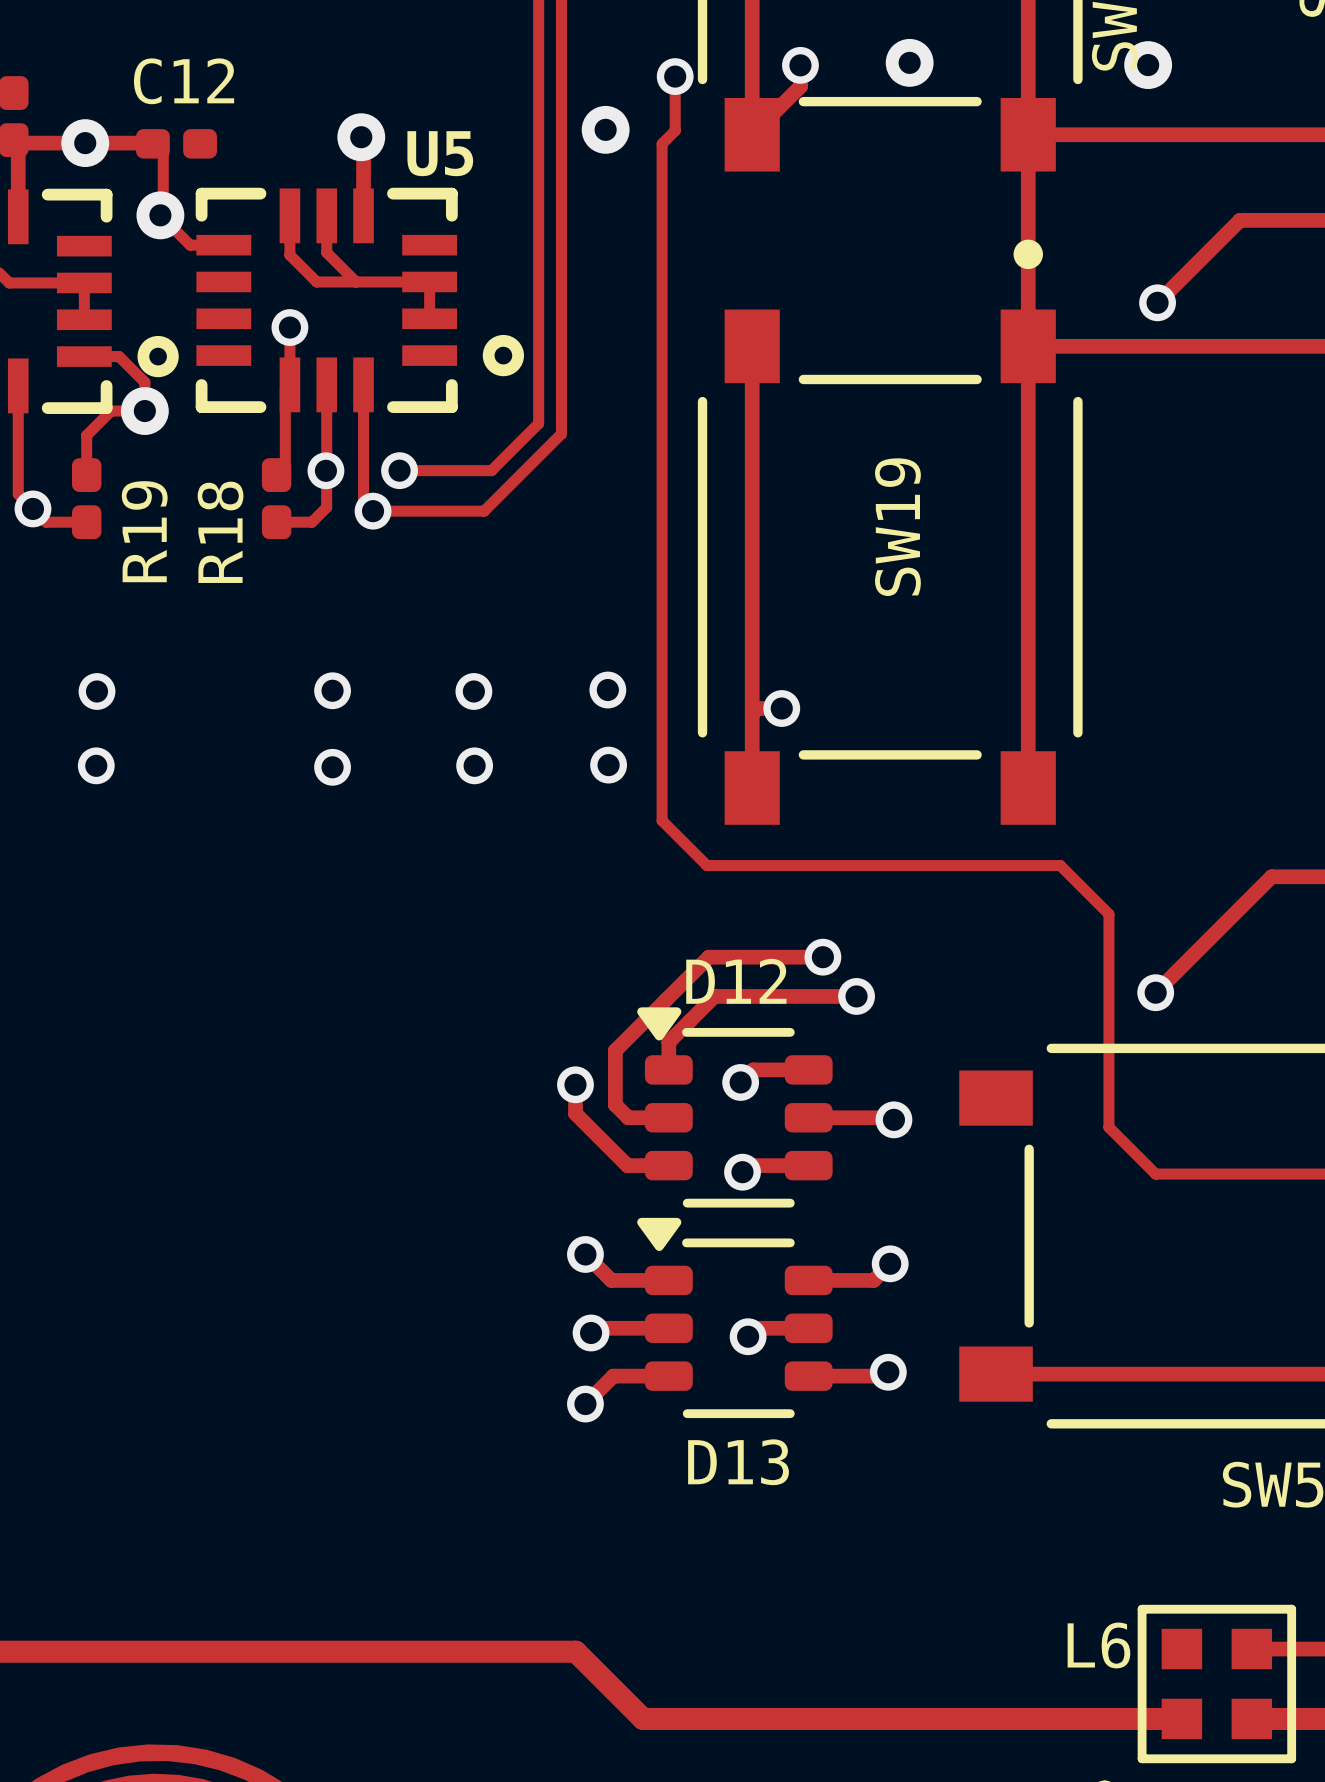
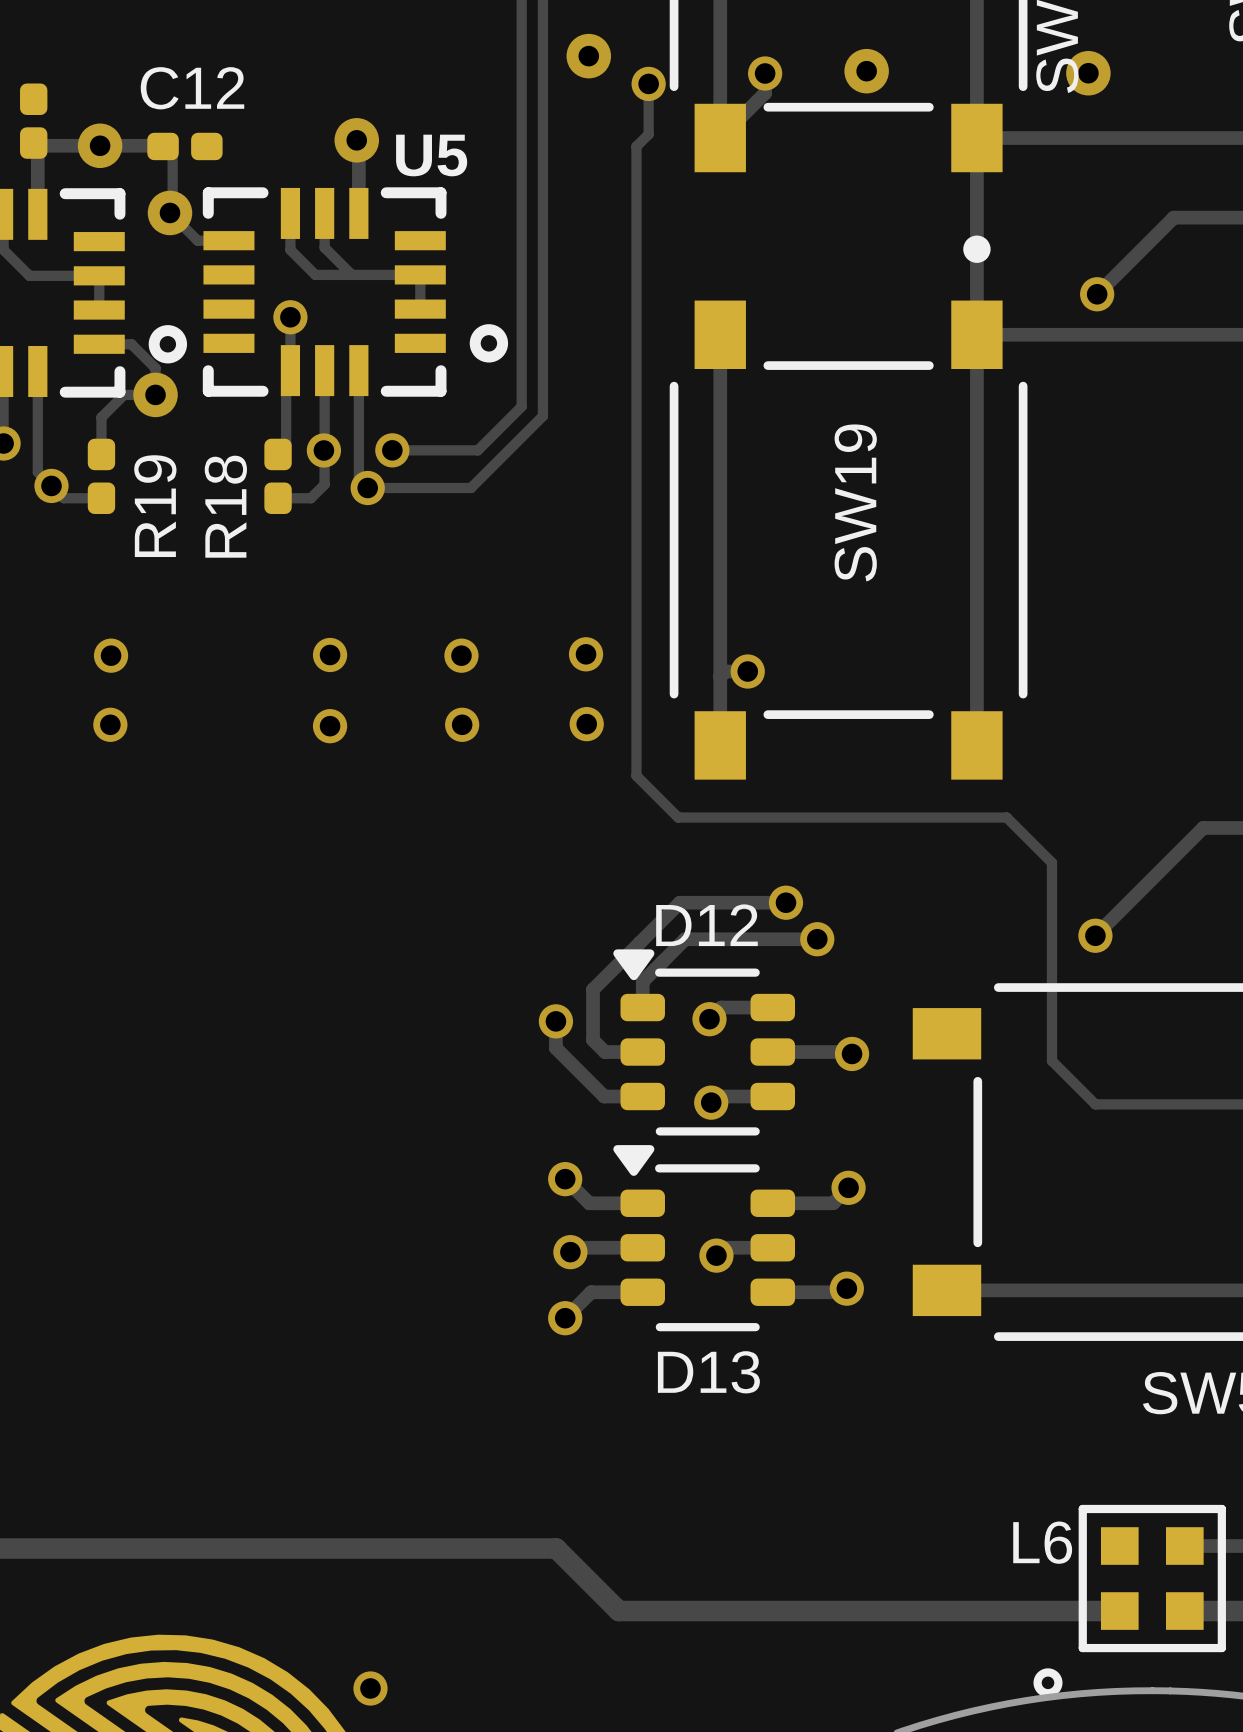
via position: (605, 129) -> (588, 56)

